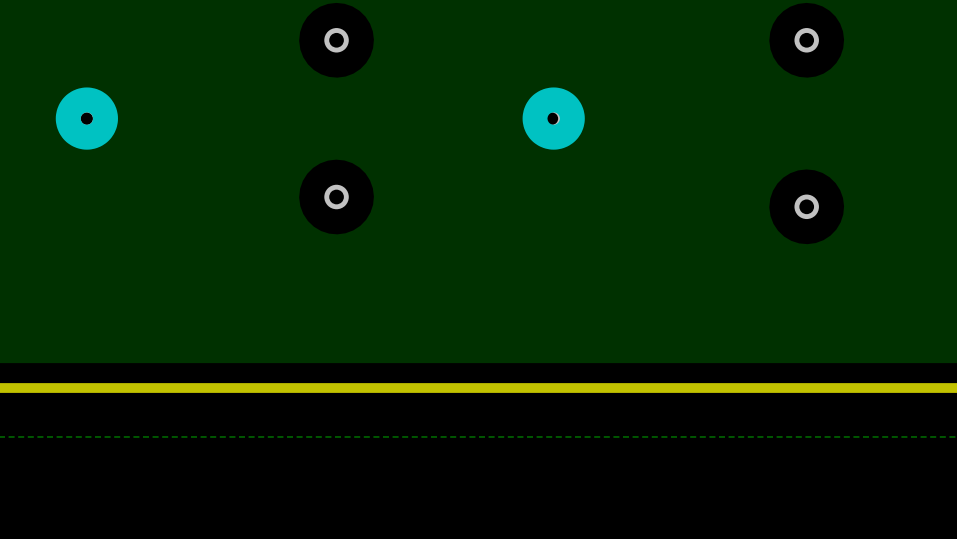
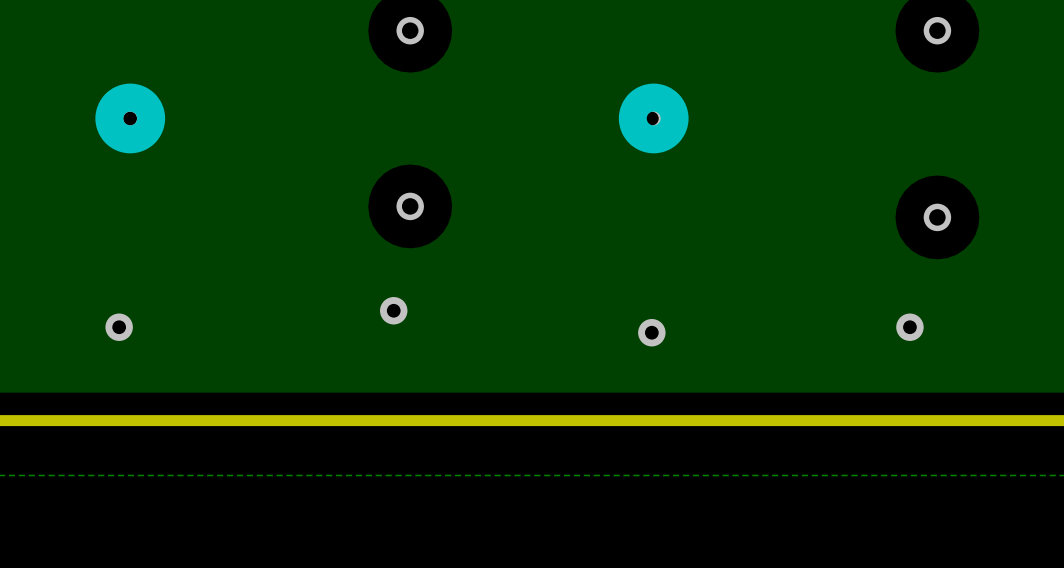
via: none -> (393, 310)
via: none -> (119, 327)
via: none -> (909, 327)
via: none -> (651, 332)

